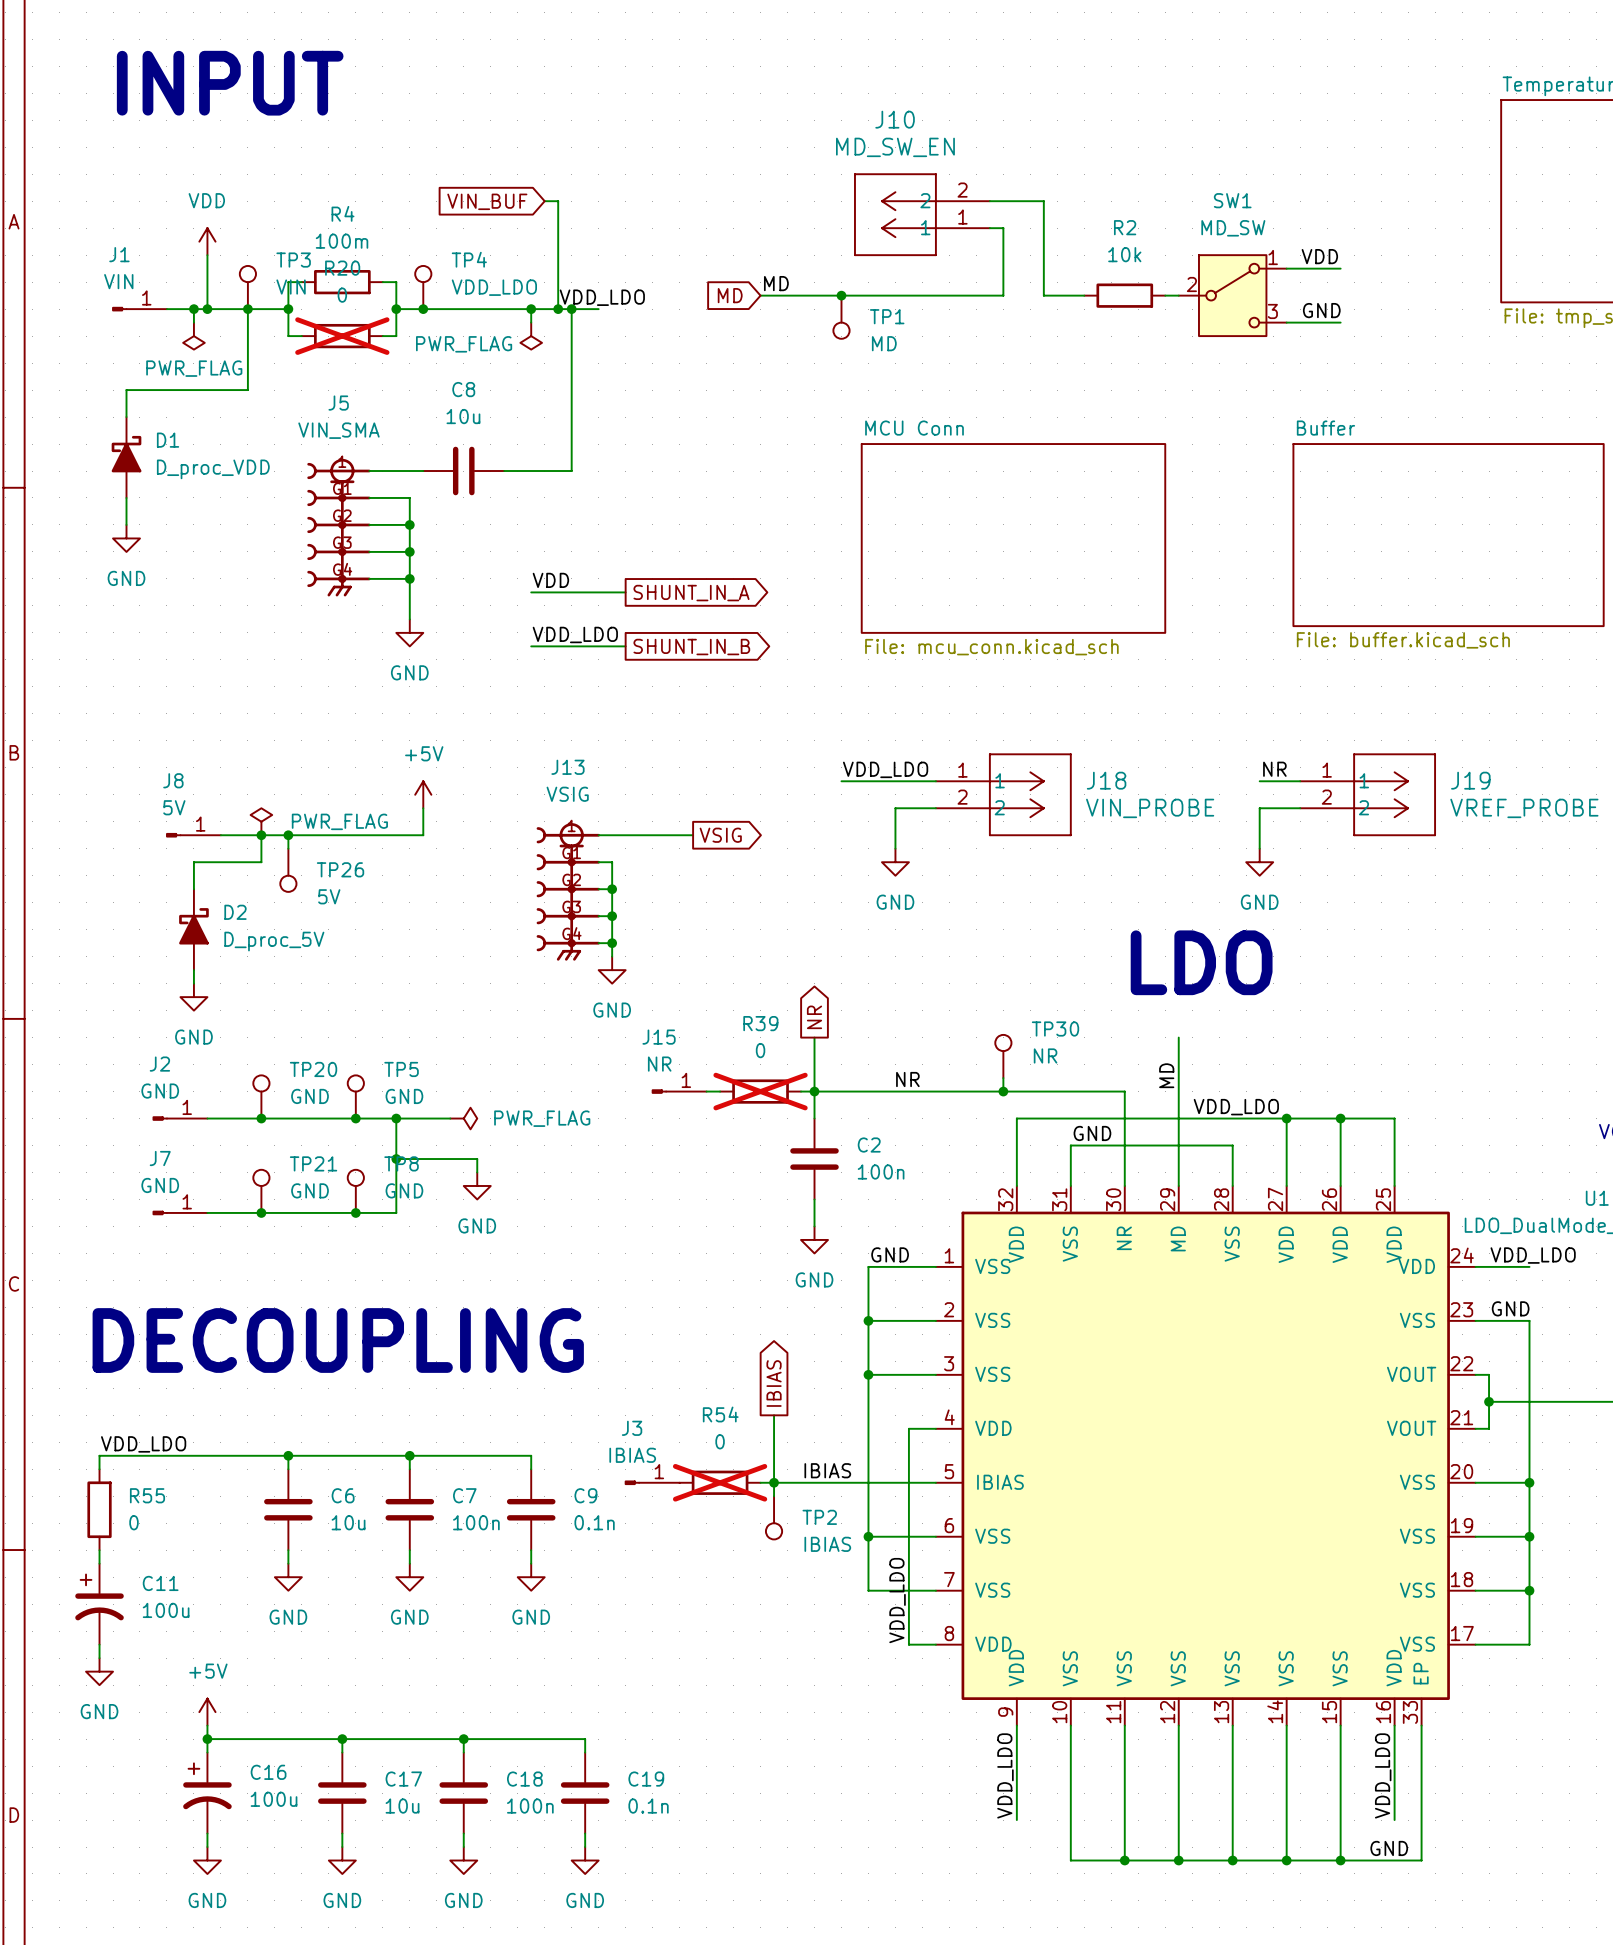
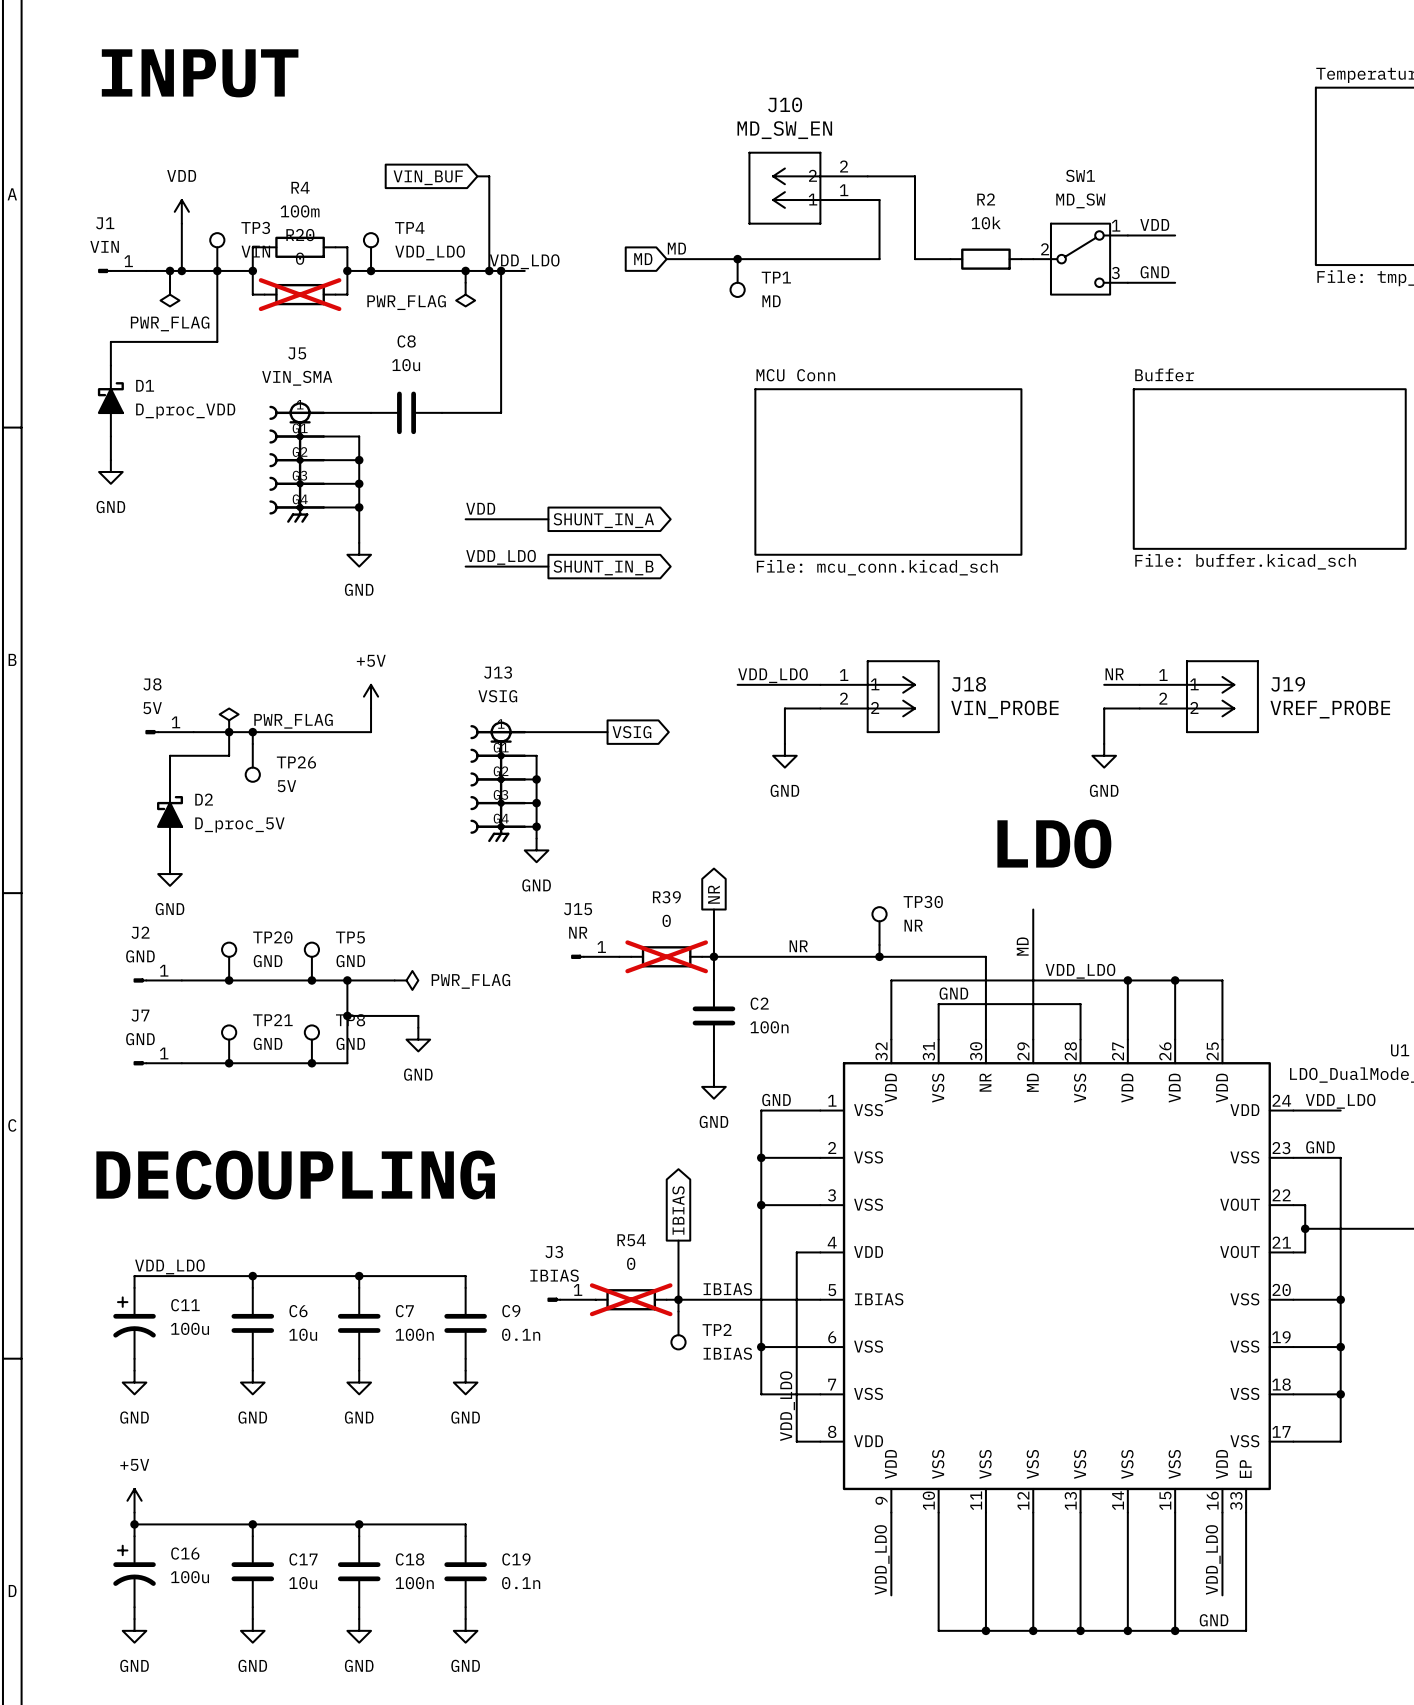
label position: VDD_LDO (143, 1444) -> VDD_LDO (169, 1266)
wire: (153, 1455) (99, 1455) (99, 1469) -> (134, 1276) (134, 1287)
R55: 0 (99, 1509) -> none
wire: (99, 1550) (99, 1563) -> none
power symbol: none -> GND (134, 1382)
C11 position: (99, 1604) -> (134, 1323)
wire: (99, 1644) (99, 1658) -> (134, 1358) (134, 1370)
power symbol: GND (99, 1671) -> none
power symbol position: +5V (207, 1712) -> +5V (134, 1500)
wire: (207, 1725) (207, 1752) -> (134, 1512) (134, 1536)
wire: none -> (134, 1524) (181, 1524)
junction: none -> (134, 1524)
junction: (207, 1739) -> none
junction: none -> (252, 1524)
wire: (342, 1739) (342, 1752) -> (252, 1524) (252, 1536)
junction: (342, 1739) -> none
junction: none -> (359, 1524)
wire: (463, 1739) (463, 1752) -> (359, 1524) (359, 1536)
junction: (463, 1739) -> none
wire: (531, 1739) (585, 1739) (585, 1752) -> (465, 1524) (465, 1536)
C16 position: (207, 1793) -> (134, 1571)
C17 position: (342, 1793) -> (252, 1571)
C18 position: (463, 1793) -> (359, 1571)
C19 position: (585, 1793) -> (465, 1571)
wire: (207, 1833) (207, 1847) -> (134, 1607) (134, 1619)
wire: (342, 1833) (342, 1847) -> (252, 1607) (252, 1619)
wire: (463, 1833) (463, 1847) -> (359, 1607) (359, 1619)
wire: (585, 1833) (585, 1847) -> (465, 1607) (465, 1619)
power symbol: none -> GND (134, 1630)
power symbol: GND (207, 1860) -> none
power symbol: none -> GND (252, 1630)
power symbol: GND (342, 1860) -> none
power symbol: none -> GND (359, 1630)
power symbol: GND (463, 1860) -> none
power symbol: none -> GND (465, 1630)
power symbol: GND (585, 1860) -> none

